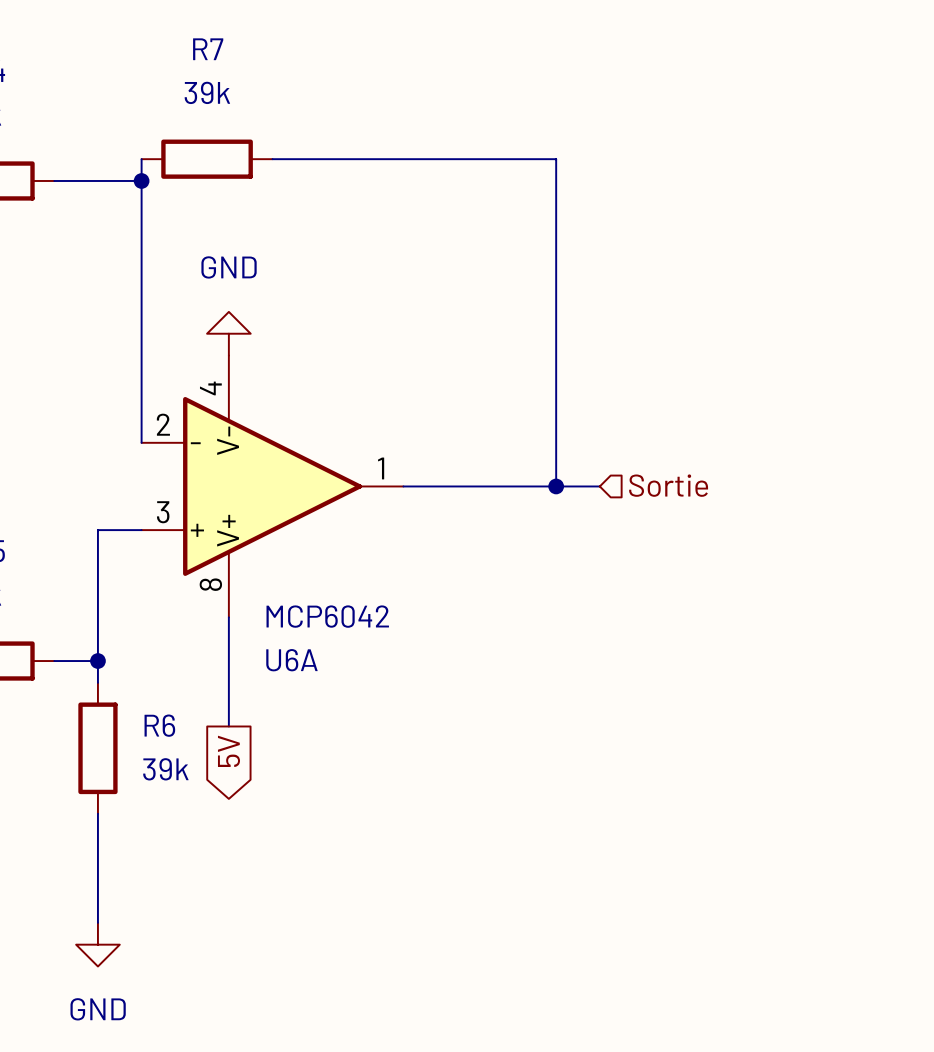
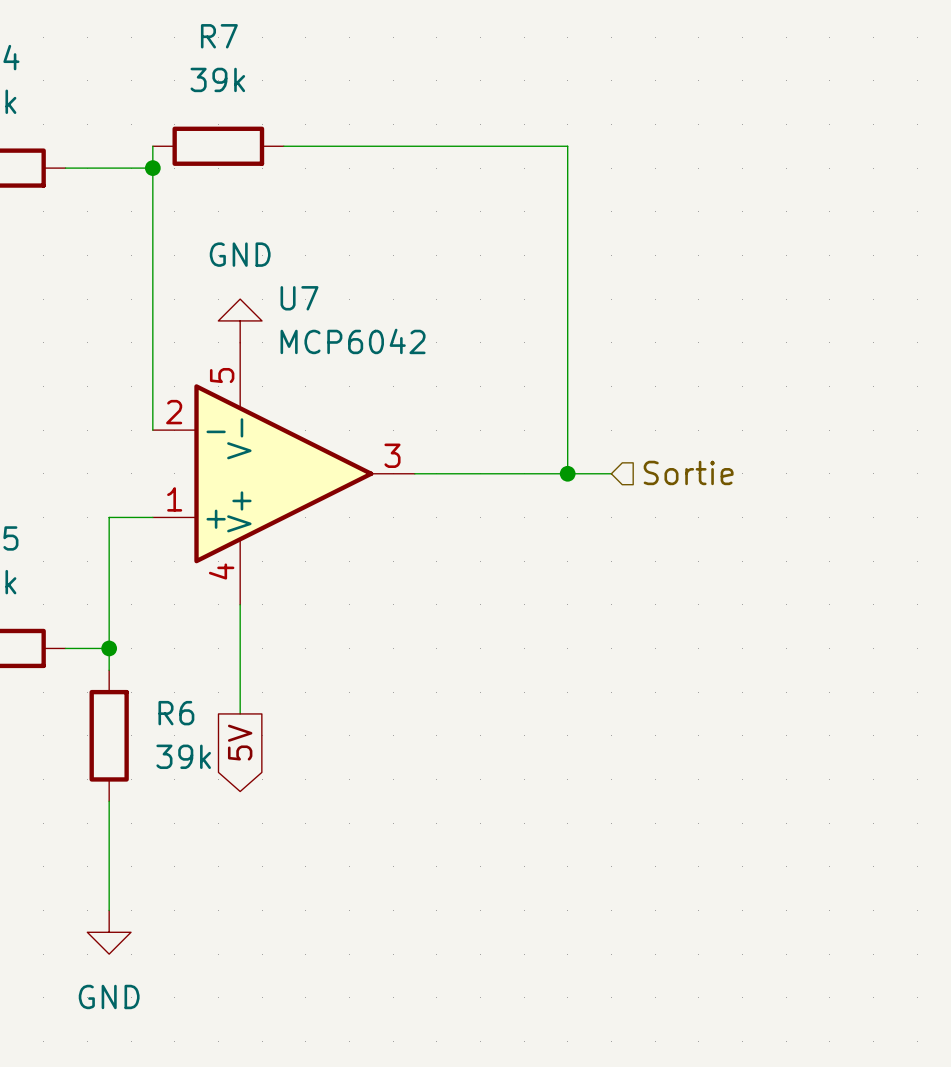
U6A pin number: 4 (210, 388) -> 5 (222, 375)
U6A pin number: 1 (381, 468) -> 3 (392, 455)
U6A pin number: 3 (163, 512) -> 1 (174, 499)
U6A pin number: 8 (210, 584) -> 4 (221, 571)
U6A value position: MCP6042 (327, 616) -> MCP6042 (353, 341)
U6A name: U6A (291, 660) -> U7 (299, 298)

